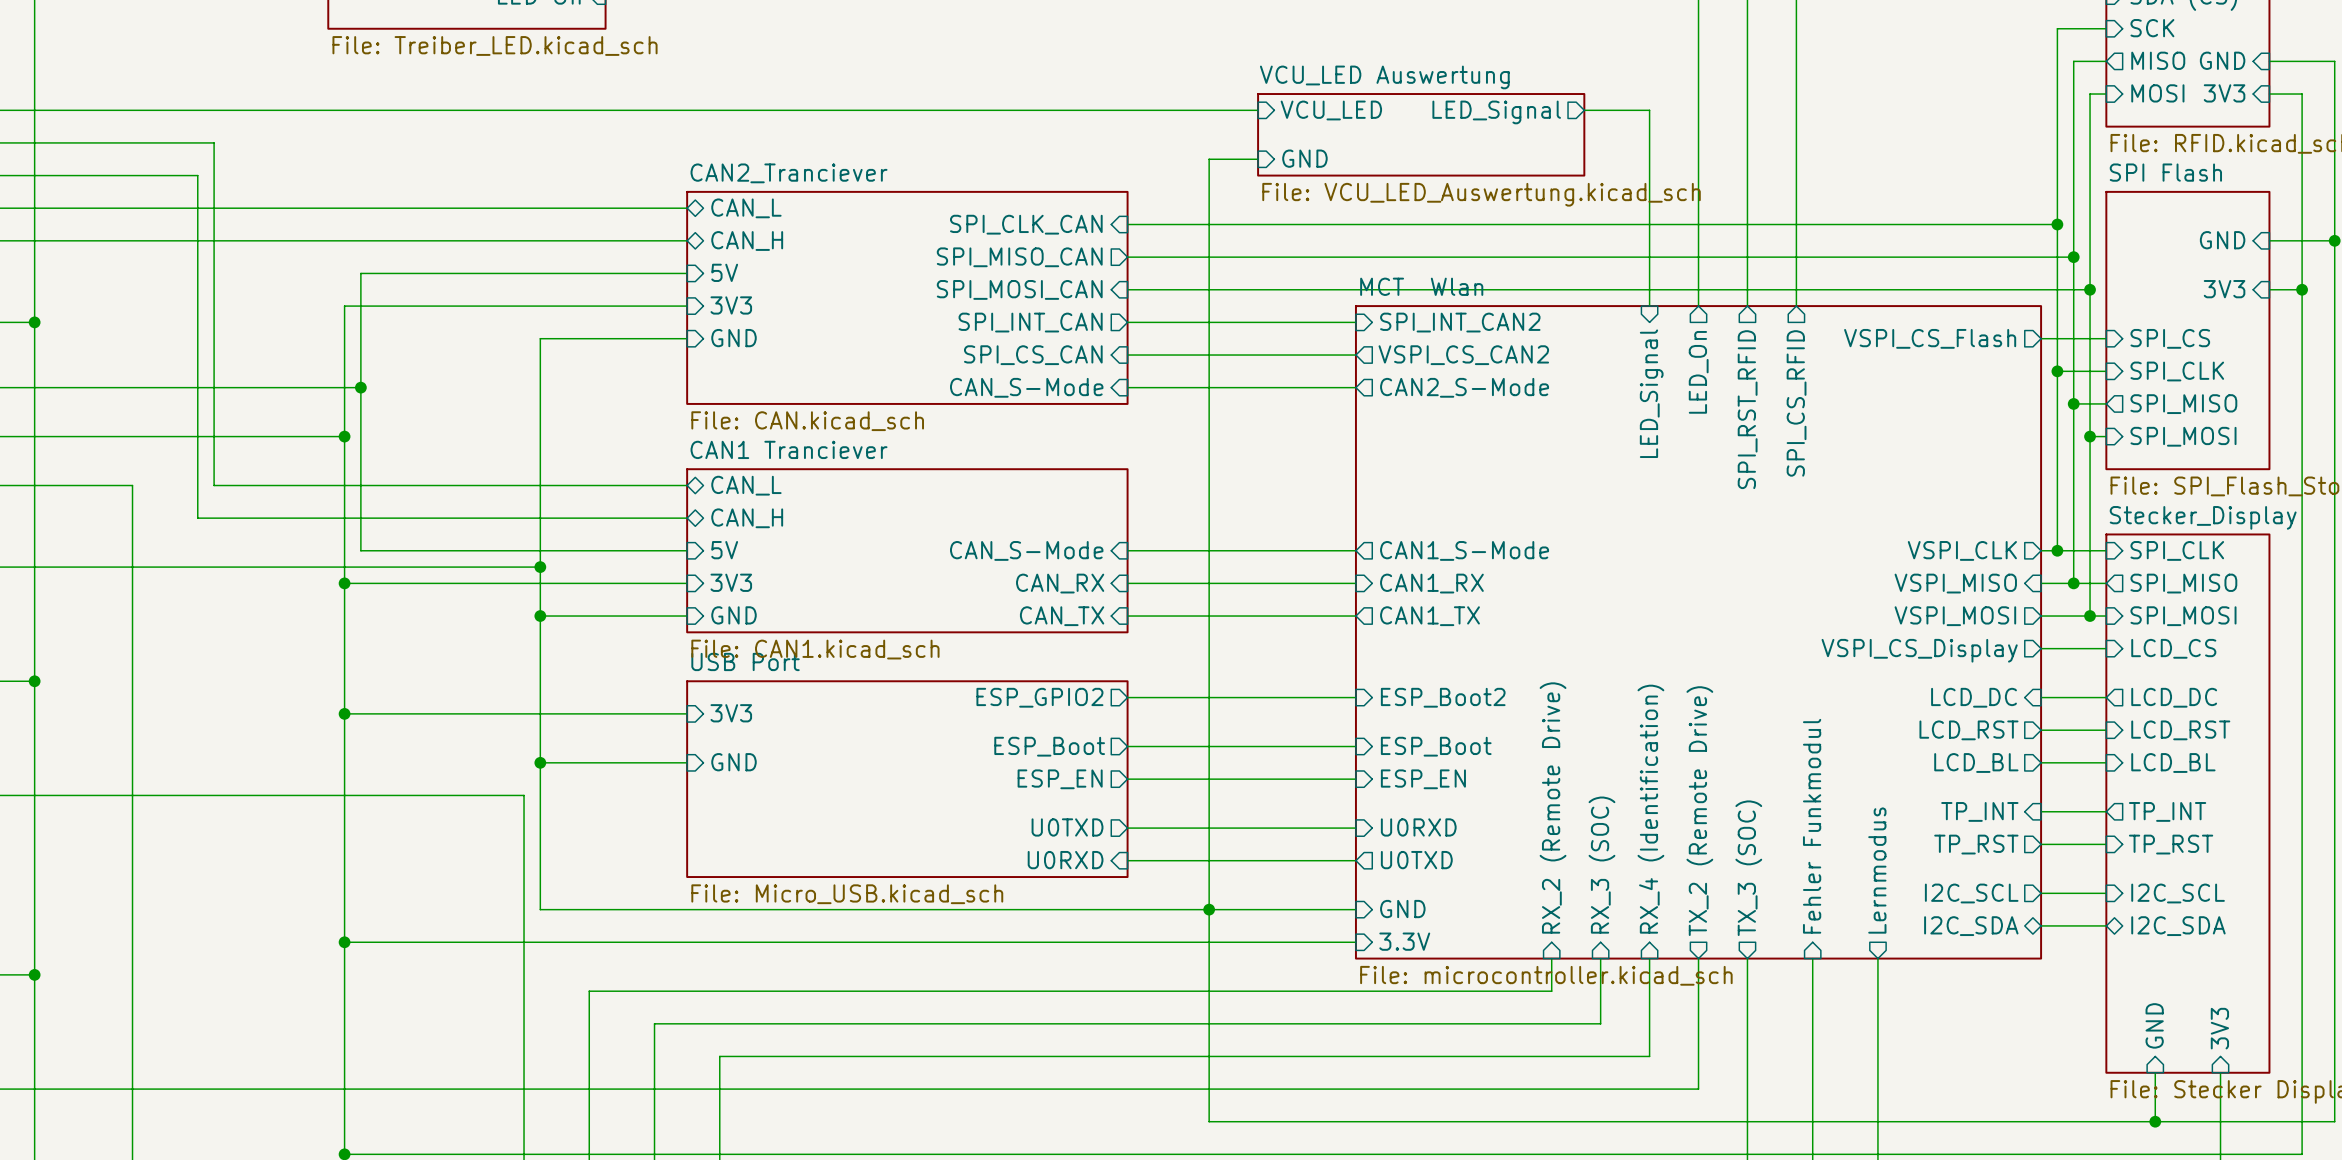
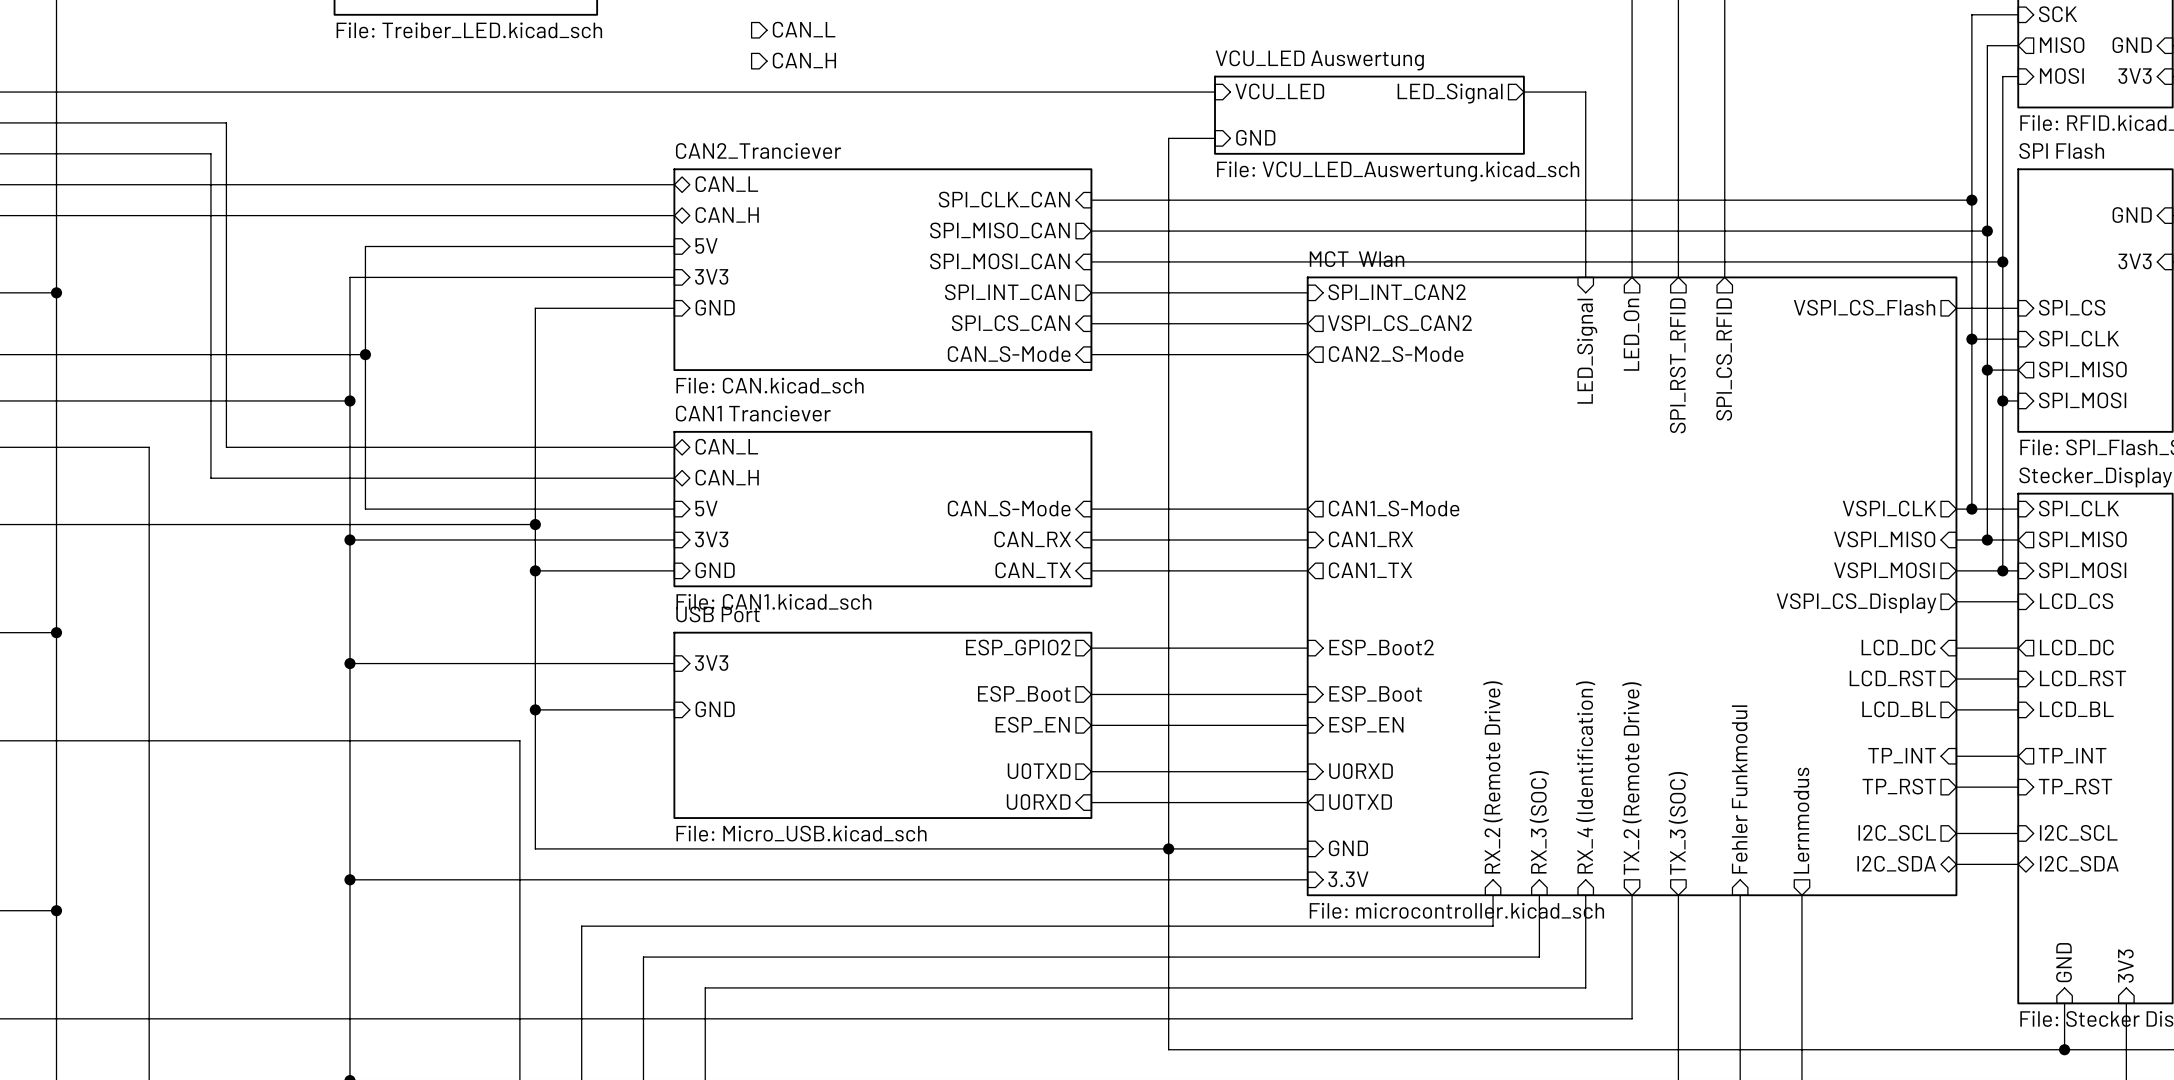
sheet pin: none -> CAN_L (804, 29)
sheet pin: none -> CAN_H (804, 60)

